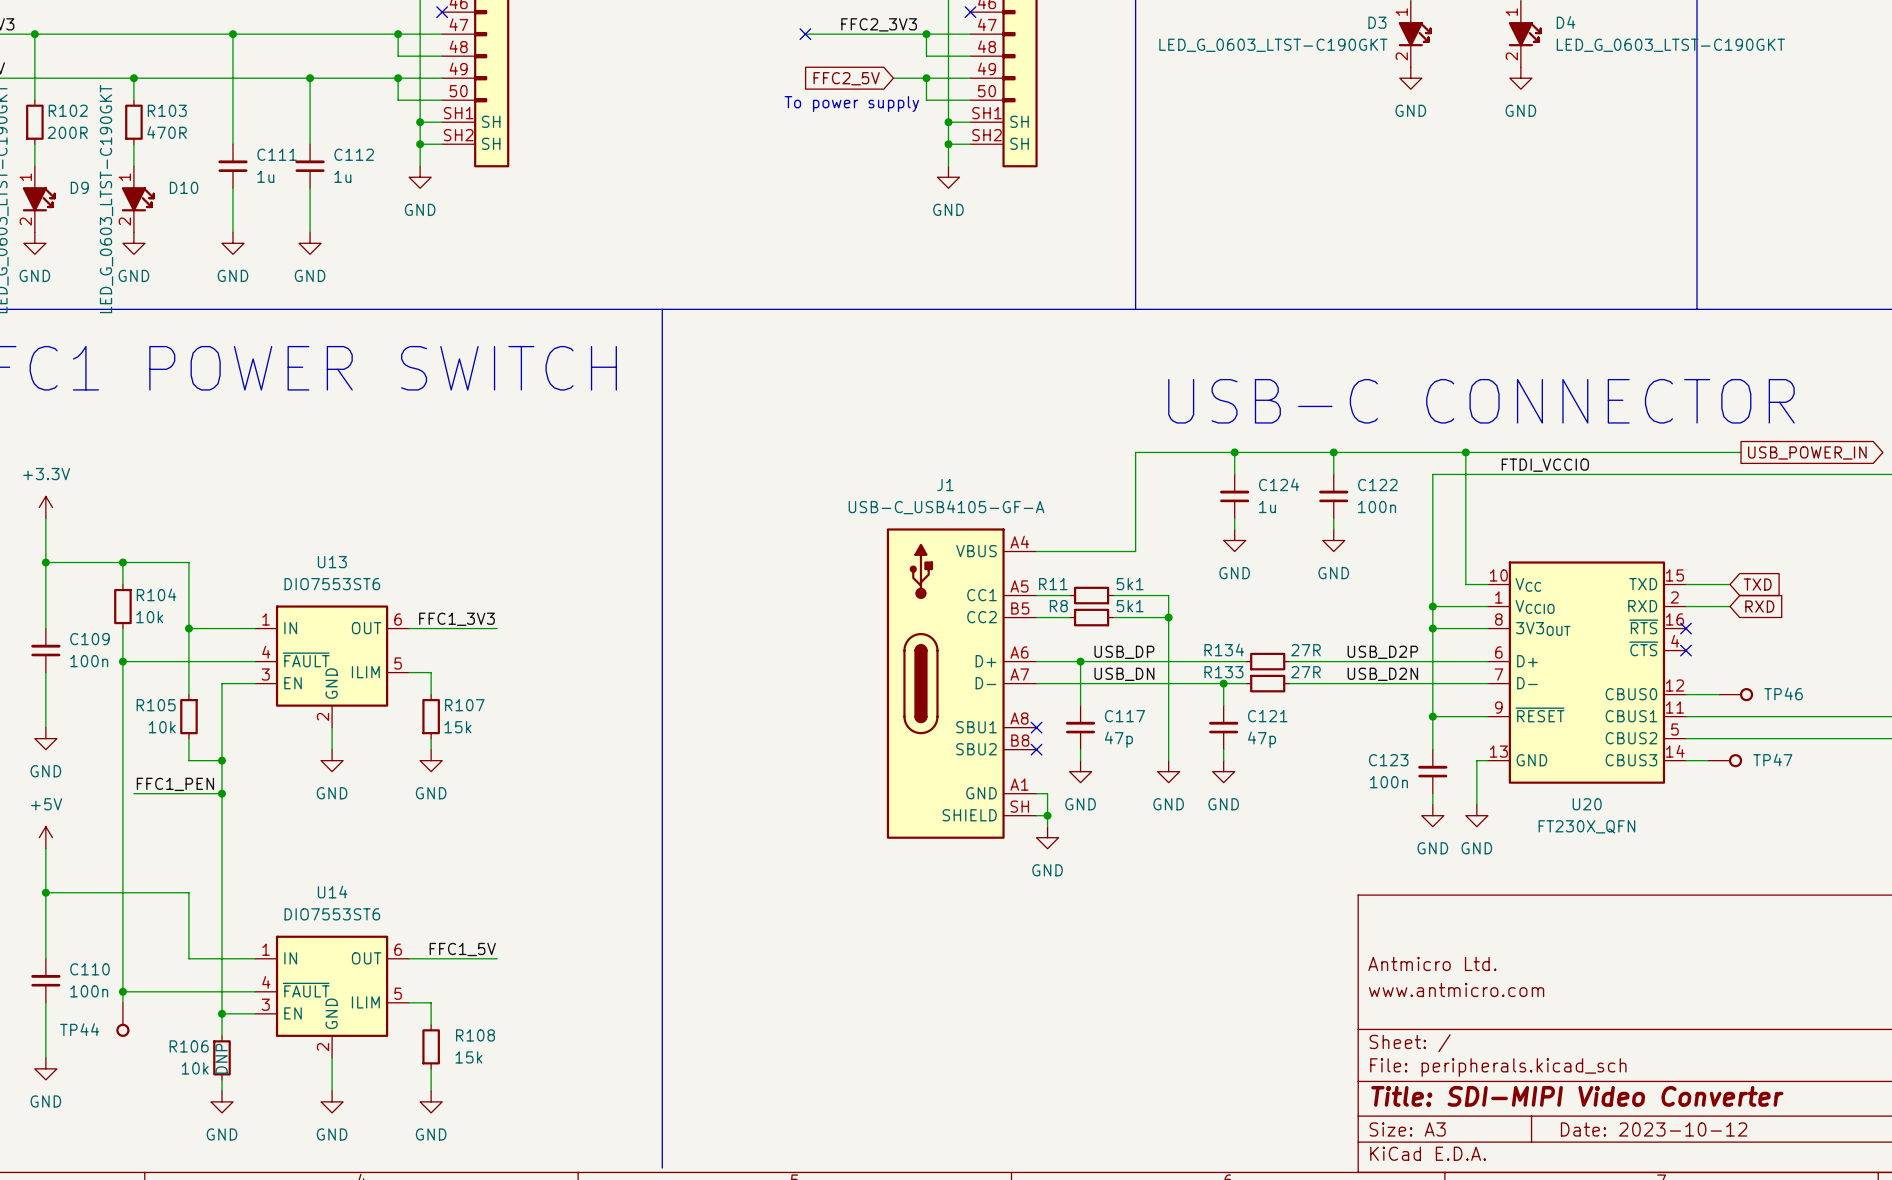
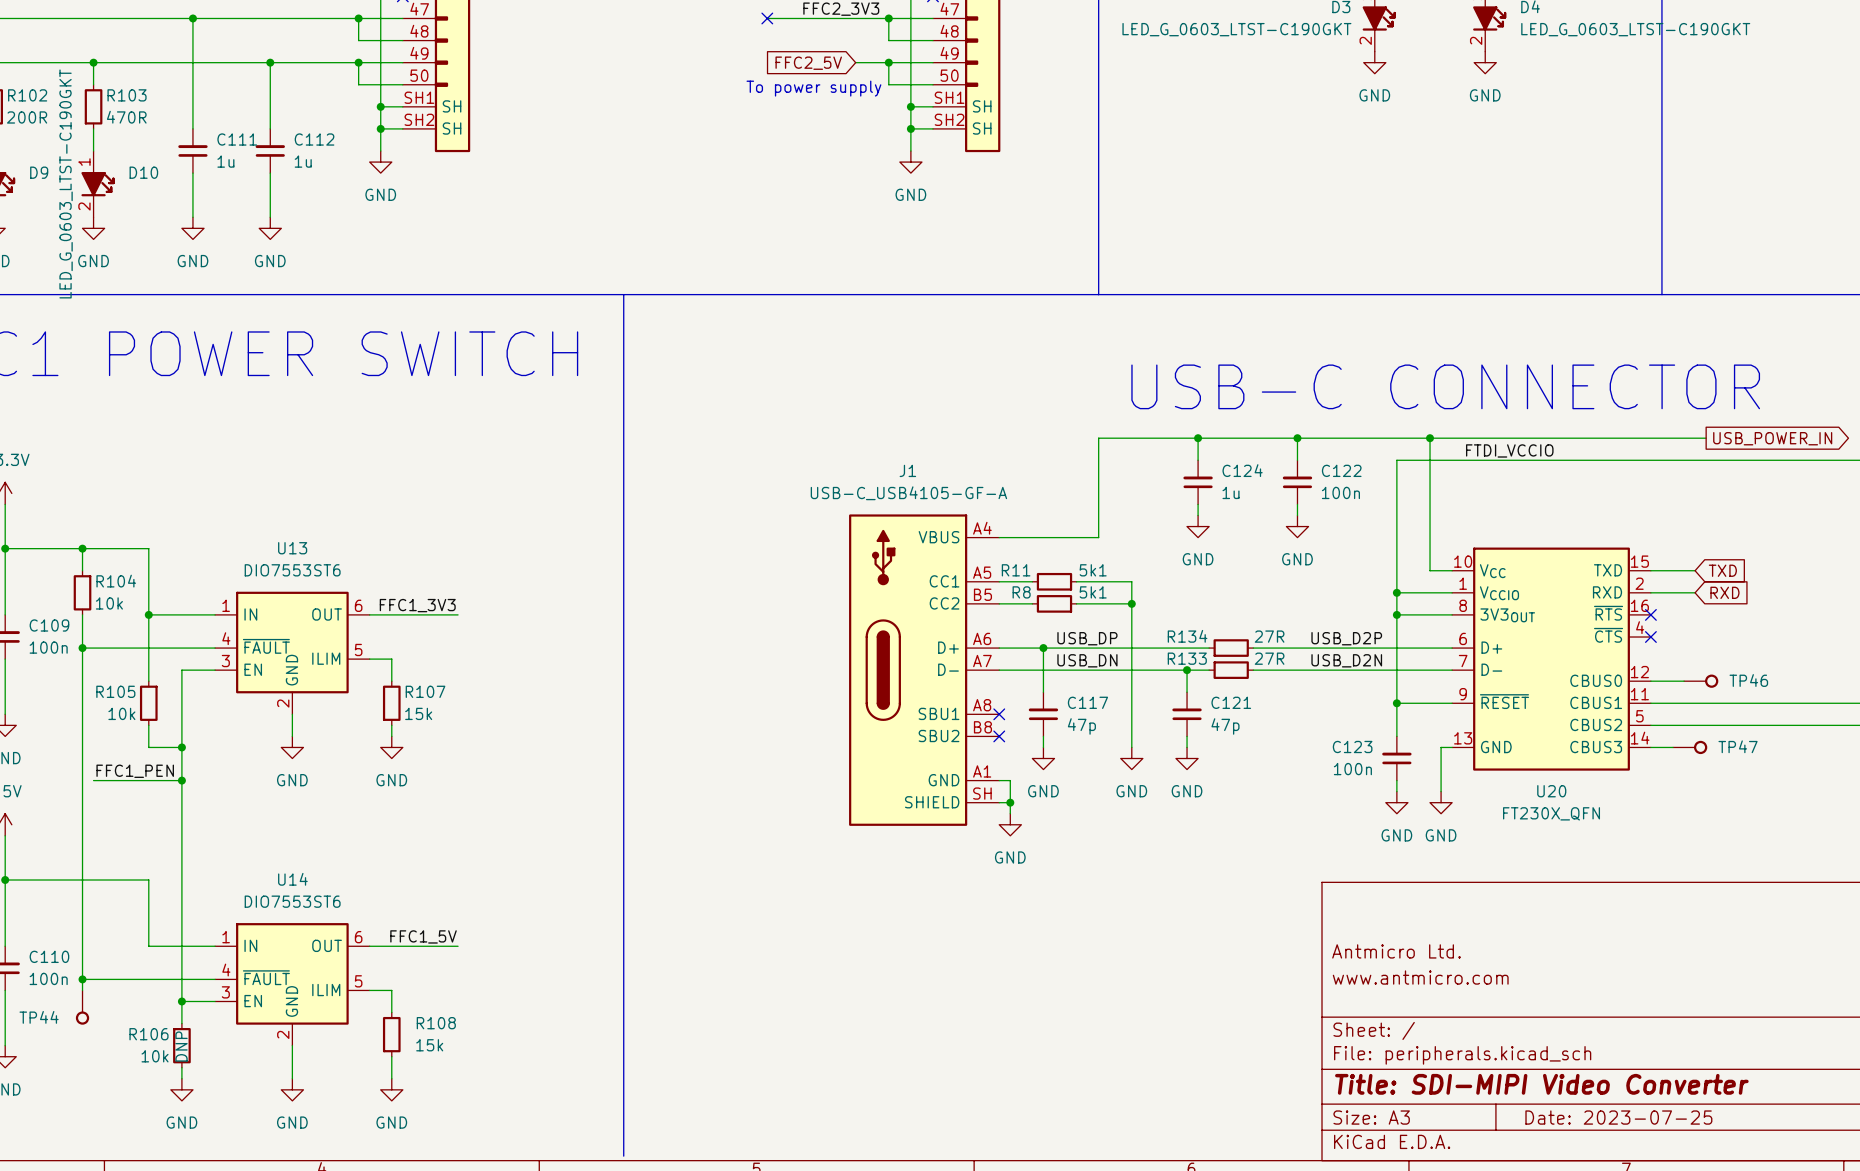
title block: Date: 2023-10-12 (1654, 1129) -> Date: 2023-07-25 (1618, 1117)

